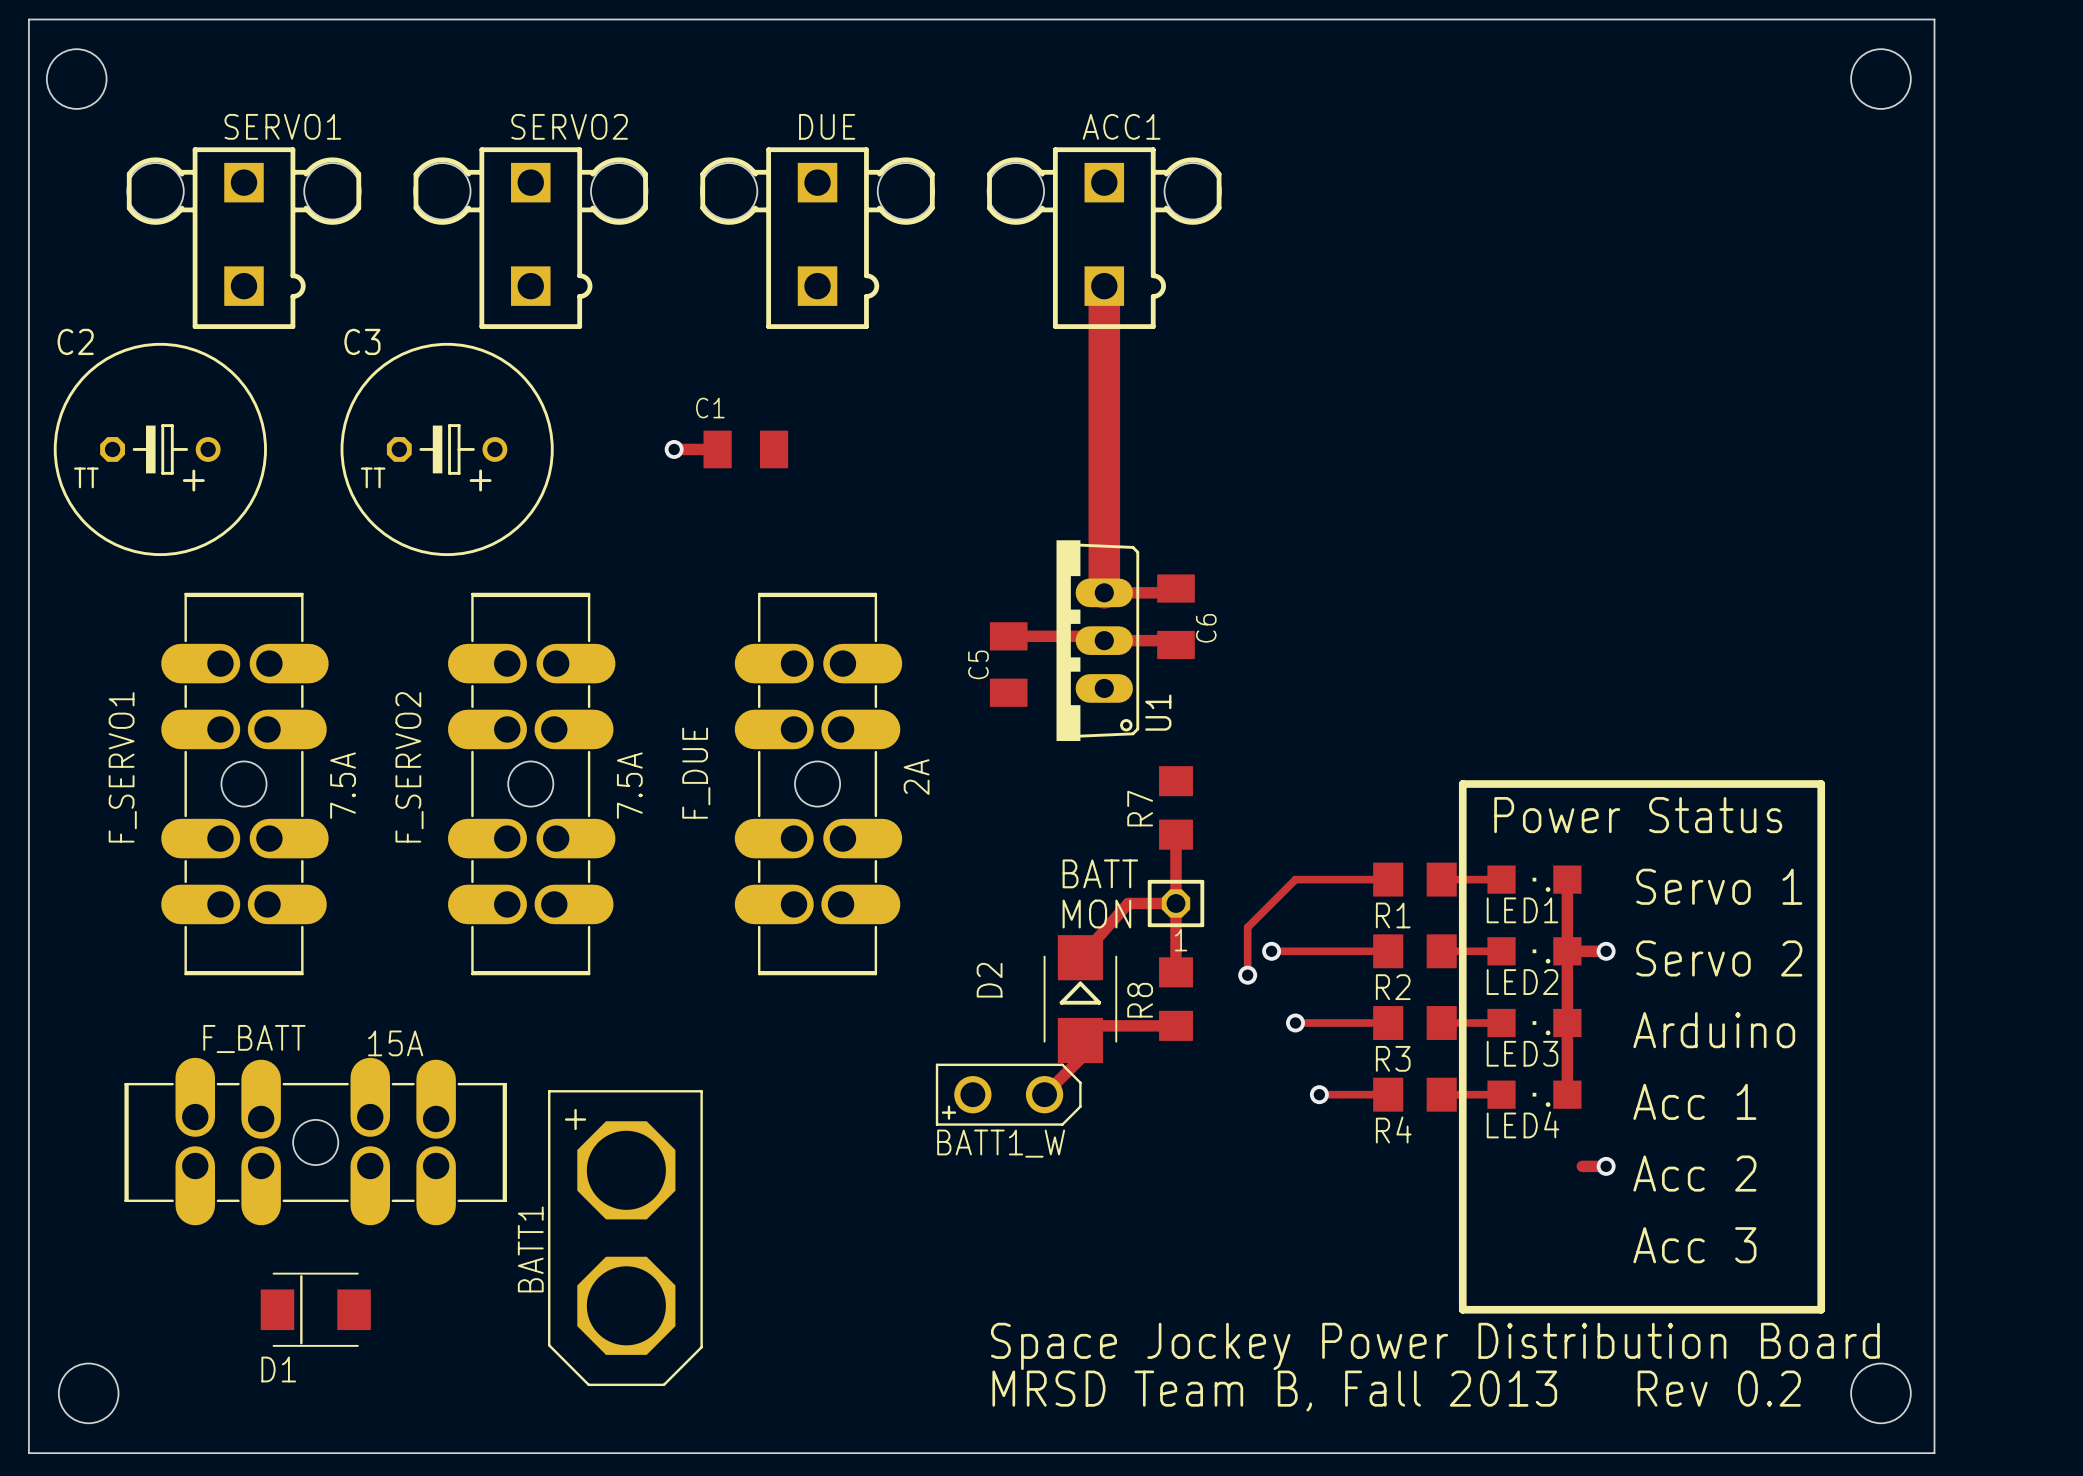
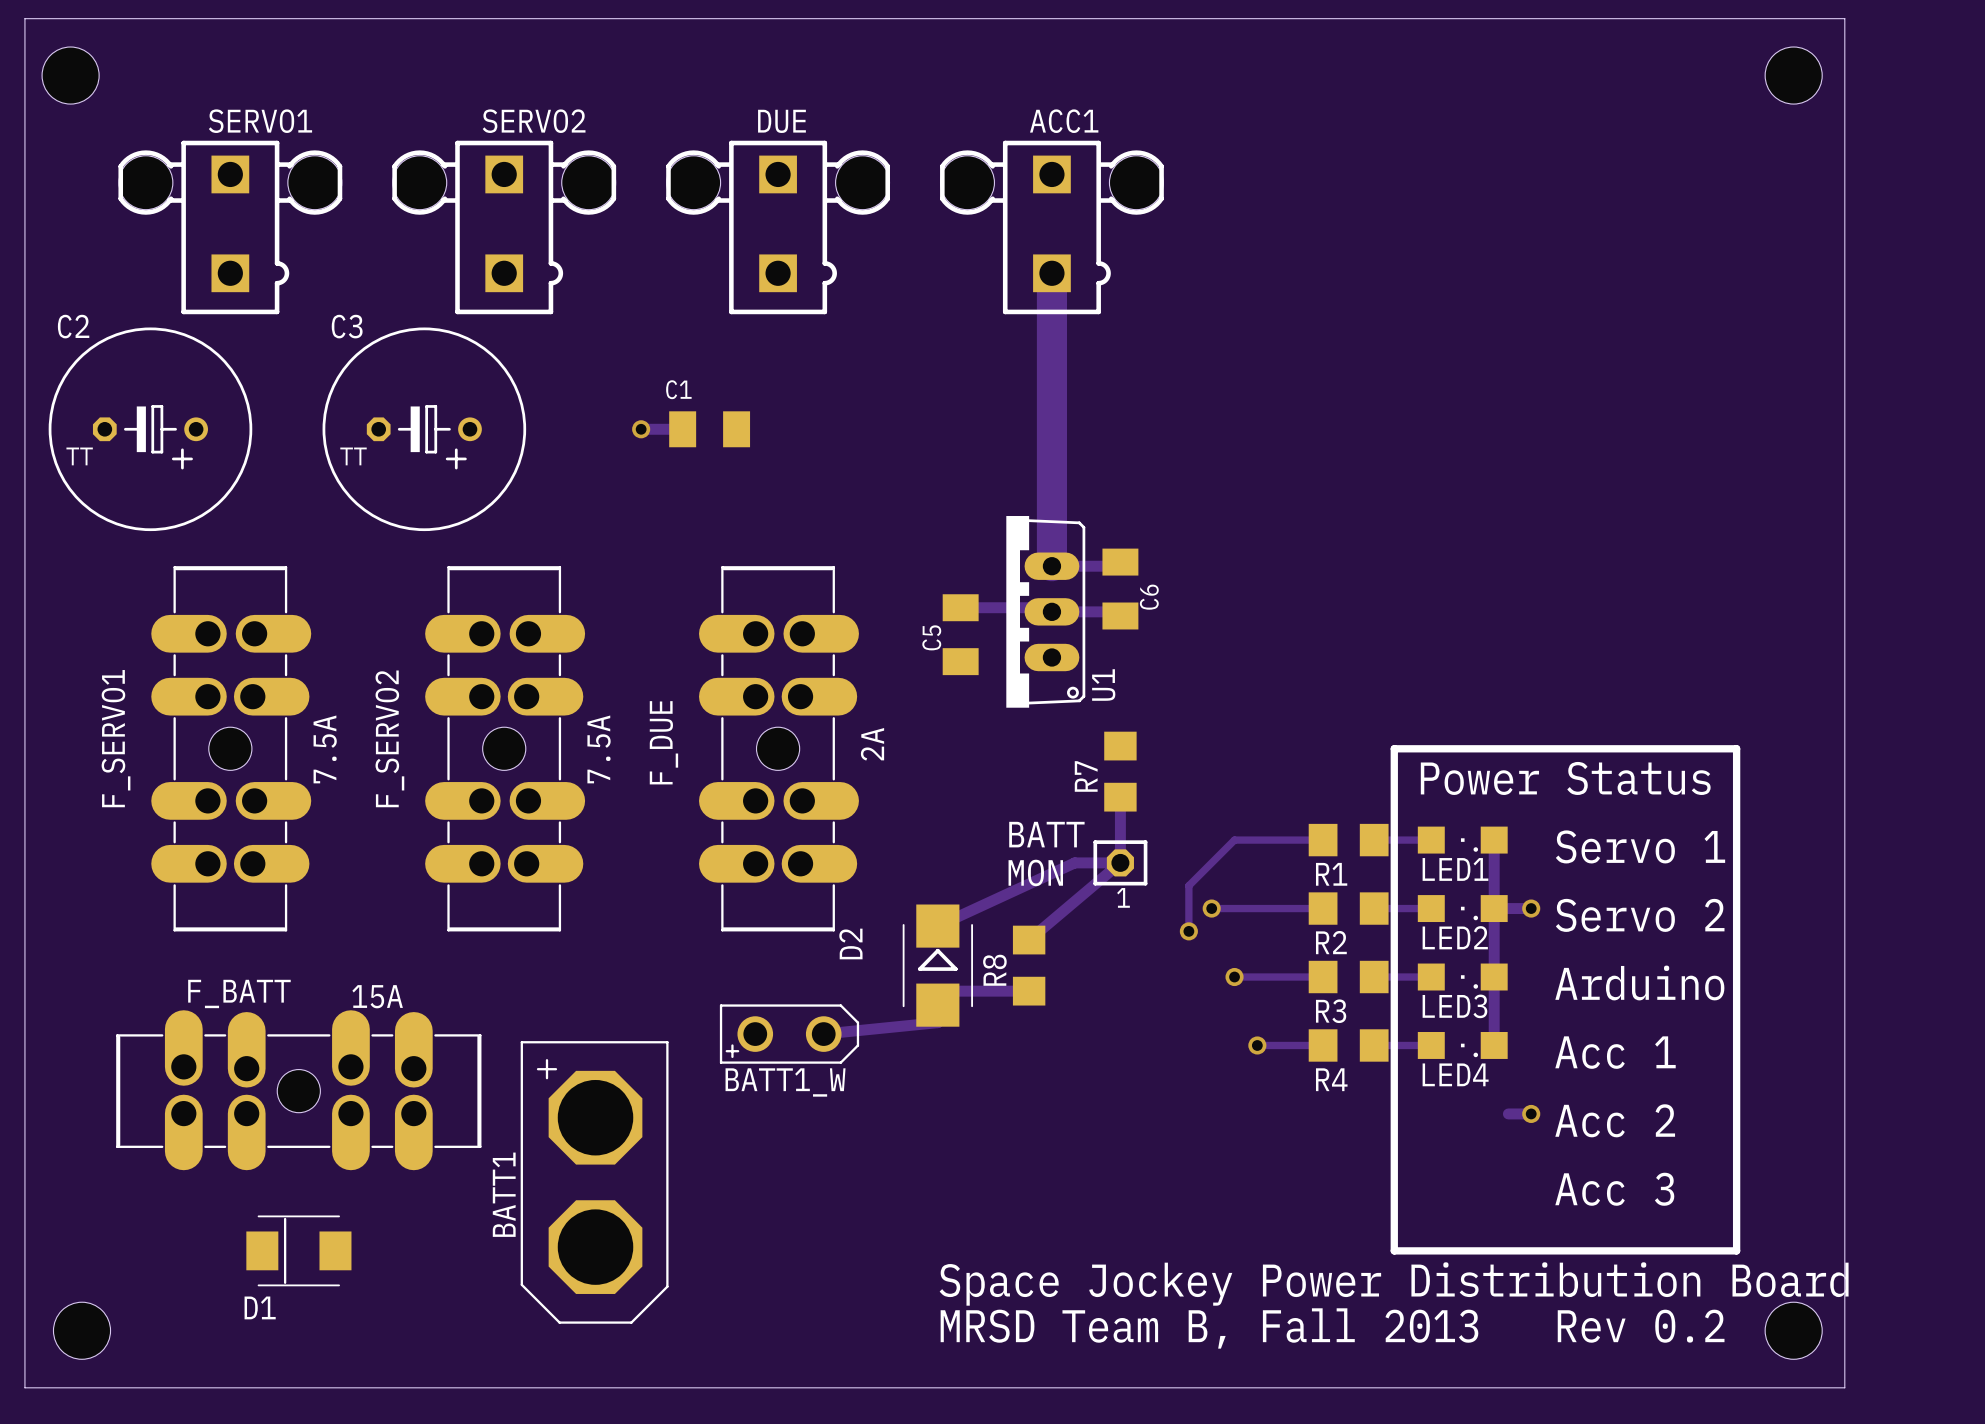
track: (1128, 903) (1080, 957) -> (1074, 862) (937, 926)
track: (1175, 903) (1175, 972) -> (1120, 862) (1029, 940)
D2 position: (1080, 999) -> (937, 965)
R8 position: (1175, 999) -> (1029, 965)
track: (1175, 1025) (1080, 1025) (1080, 1058) (1044, 1094) -> none
track: none -> (1029, 991) (937, 991) (937, 1022) (823, 1034)
BATT1_W position: (1008, 1094) -> (789, 1034)

